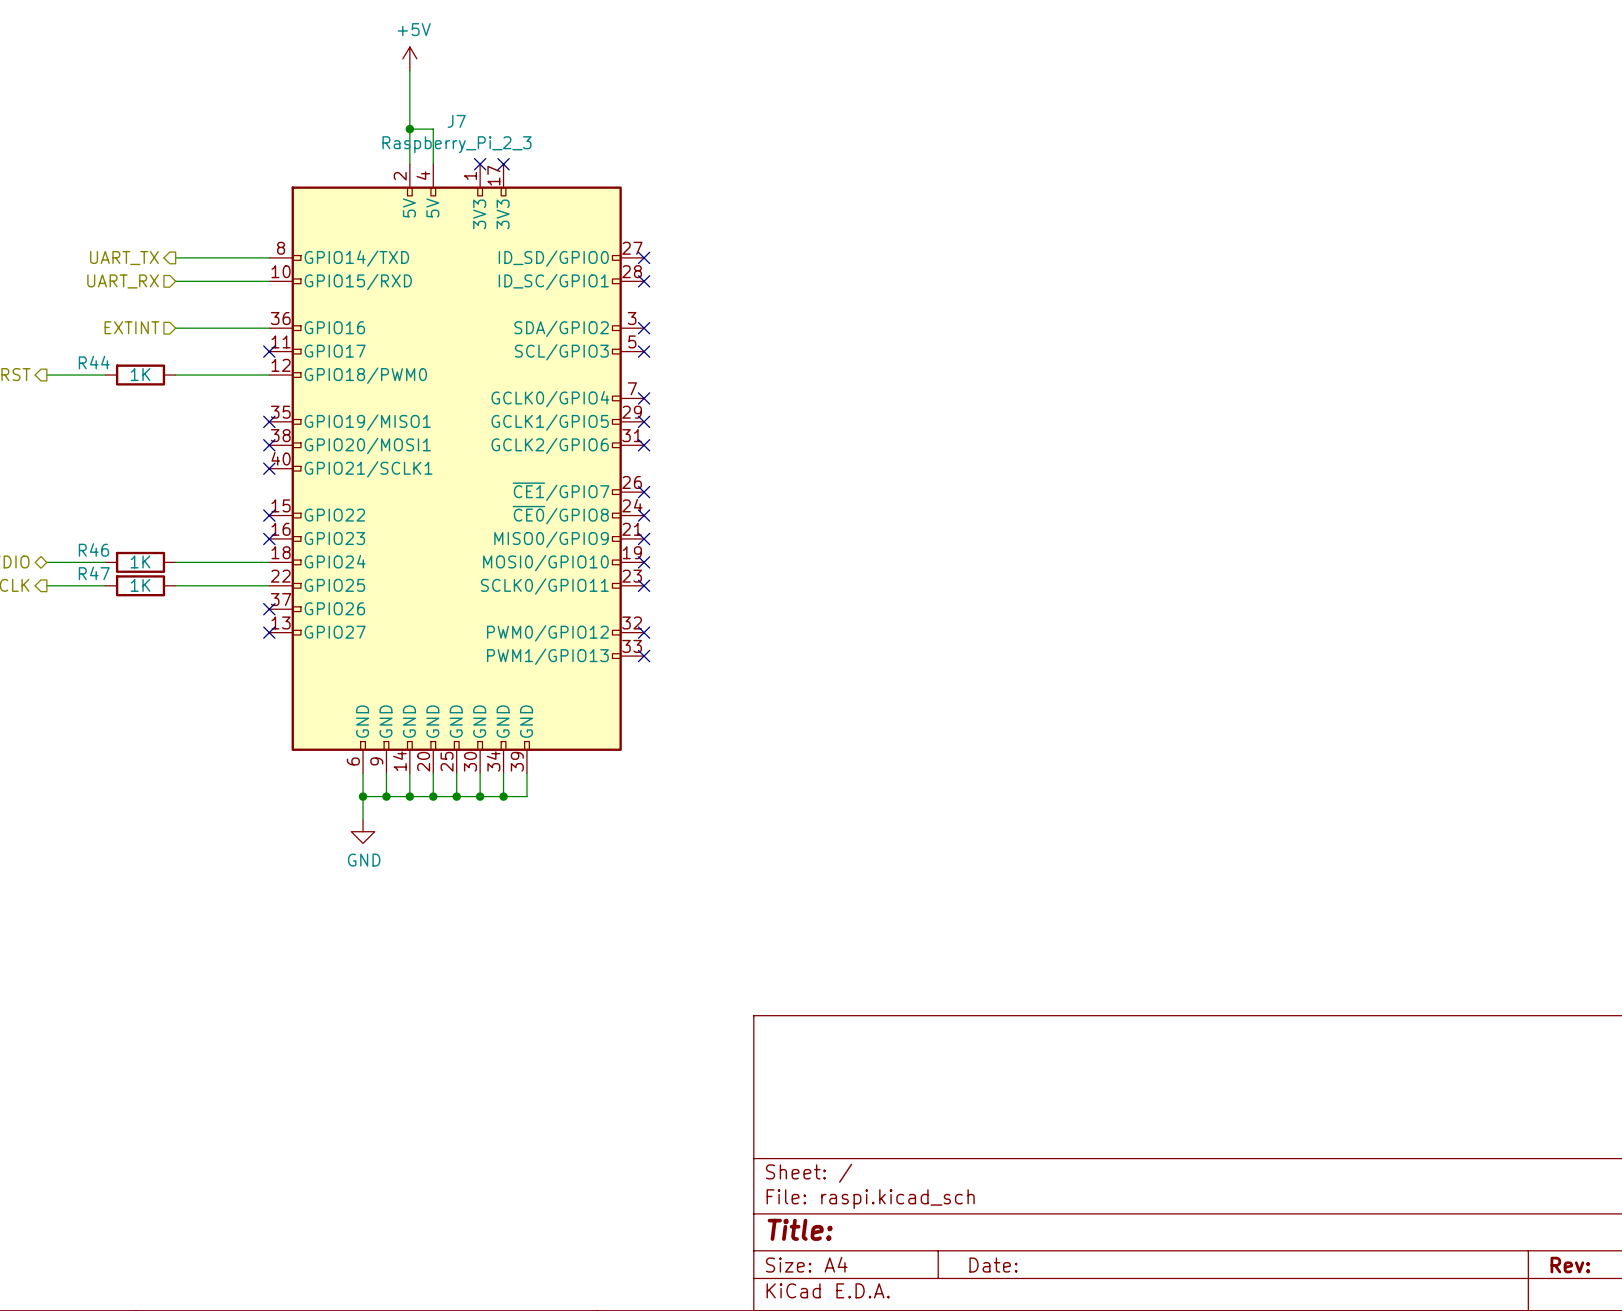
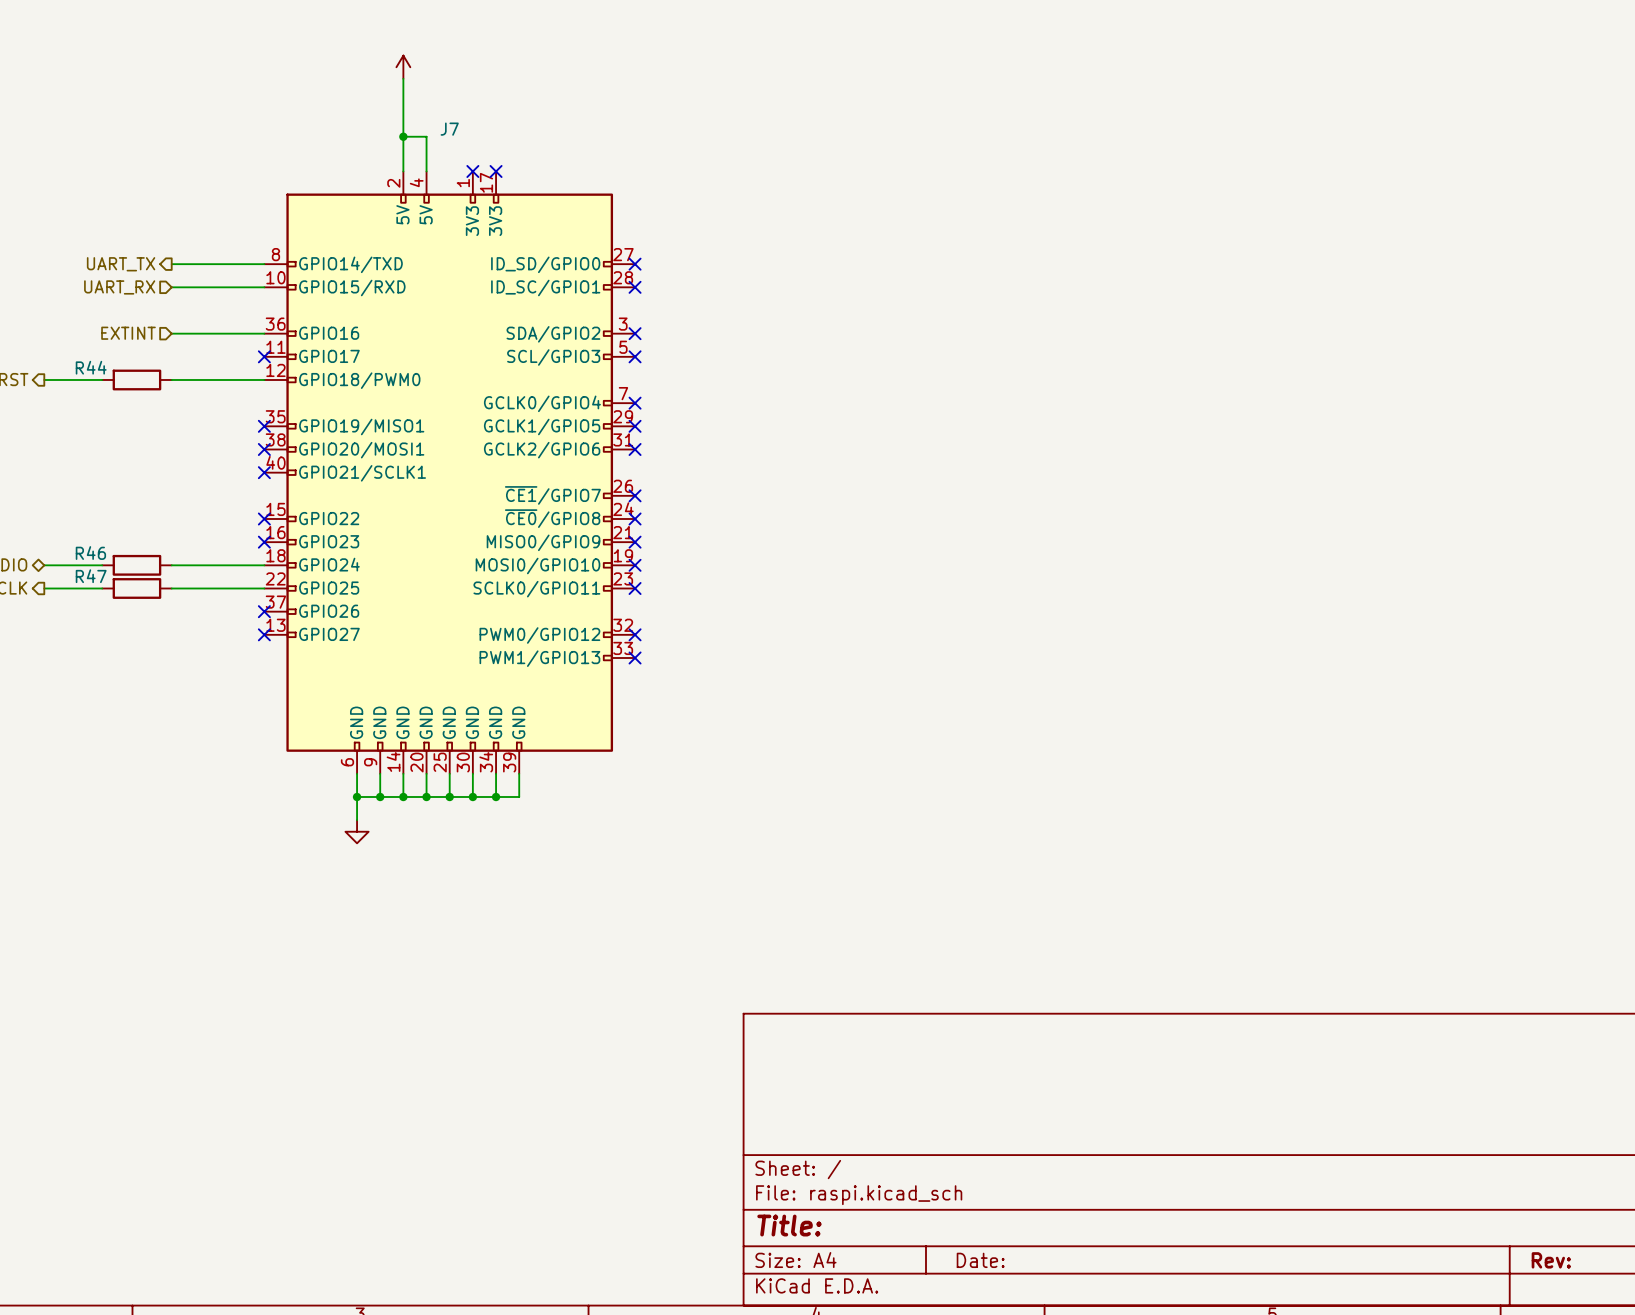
power symbol text: +5V (414, 29) -> none
J7 value: Raspberry_Pi_2_3 (456, 144) -> none
R44 value: 1K (140, 374) -> none
R46 value: 1K (140, 561) -> none
R47 value: 1K (140, 585) -> none
power symbol text: GND (364, 860) -> none

